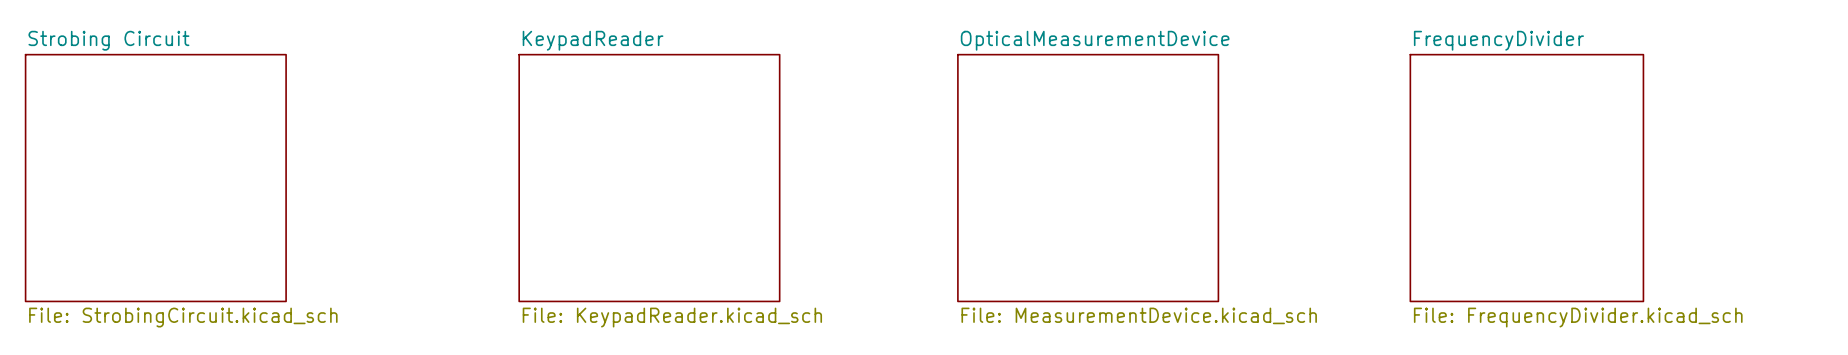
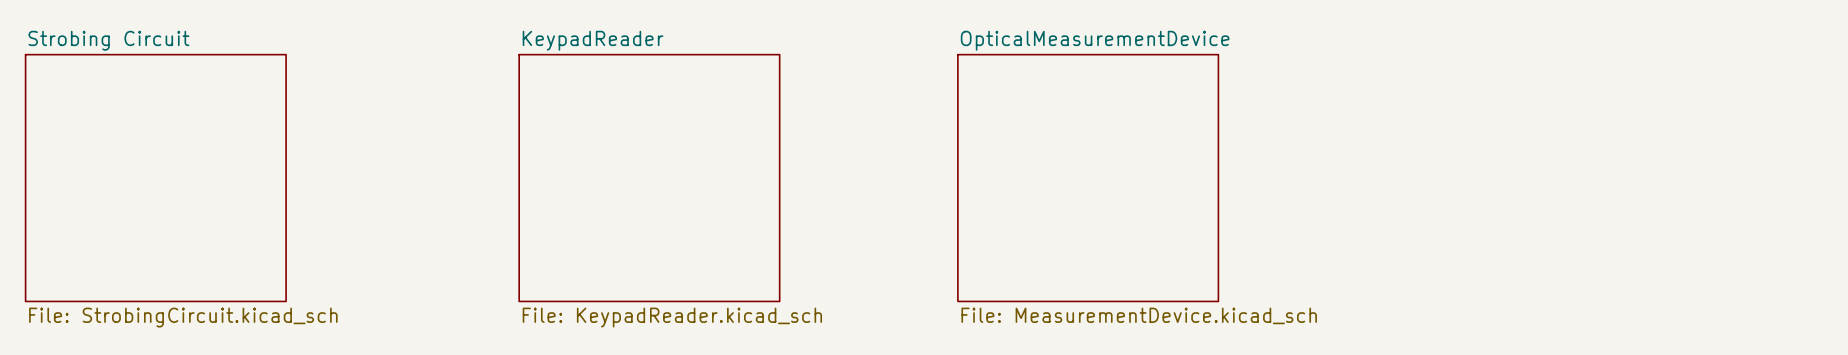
sheet FrequencyDivider: File: FrequencyDivider.kicad_sch (1526, 178) -> none

